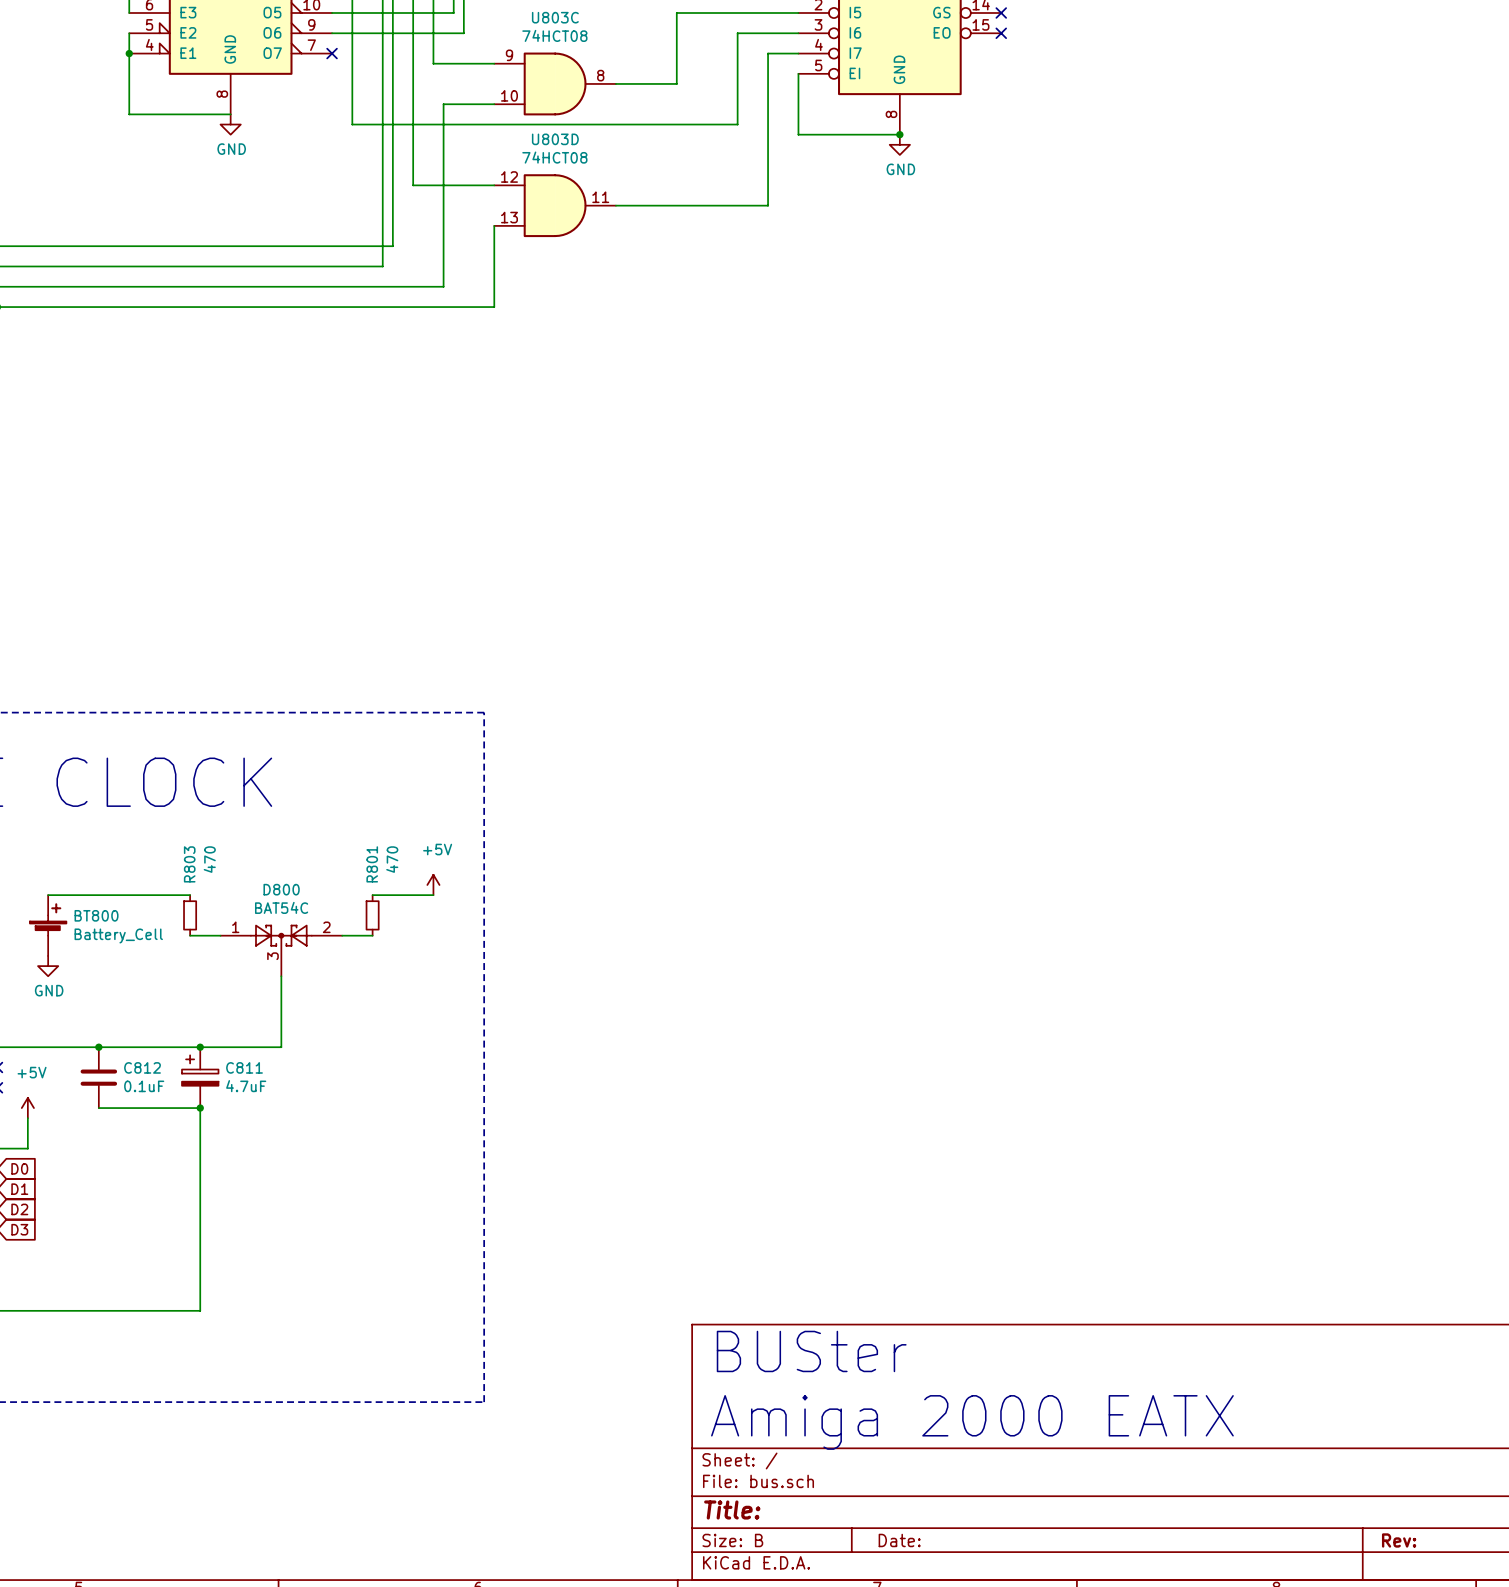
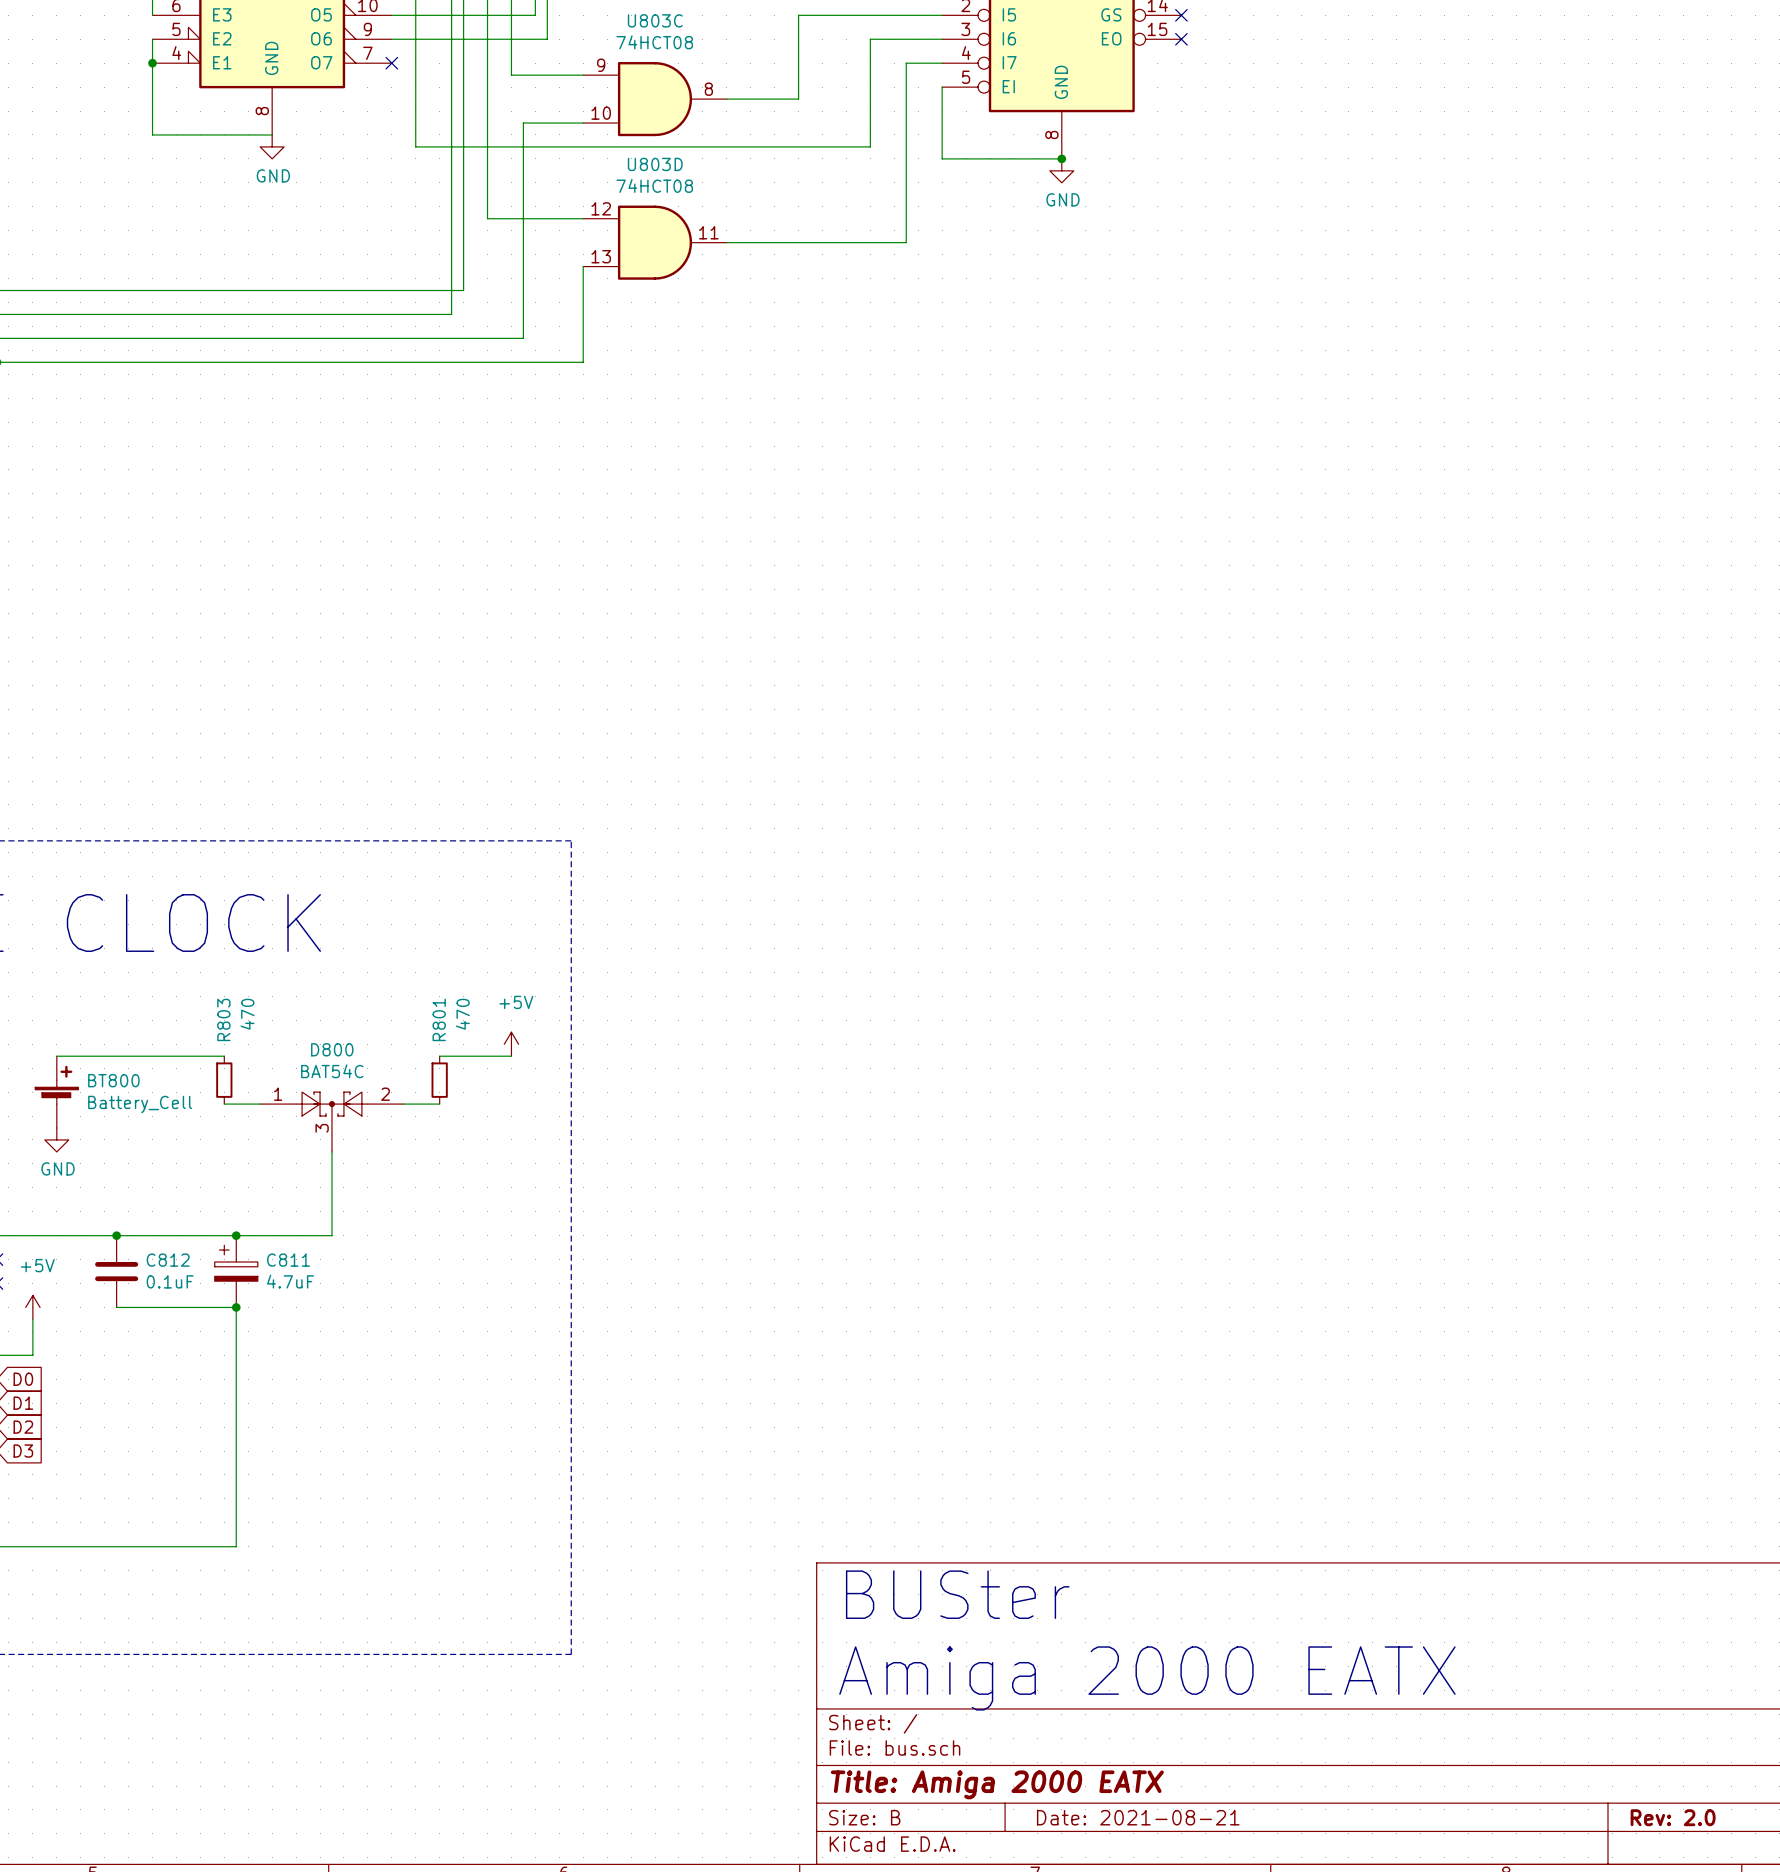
title block: Title: (732, 1509) -> Title: Amiga 2000 EATX (997, 1784)
title block: Date: (899, 1540) -> Date: 2021-08-21 (1138, 1817)
title block: Rev: (1399, 1540) -> Rev: 2.0 (1673, 1817)

